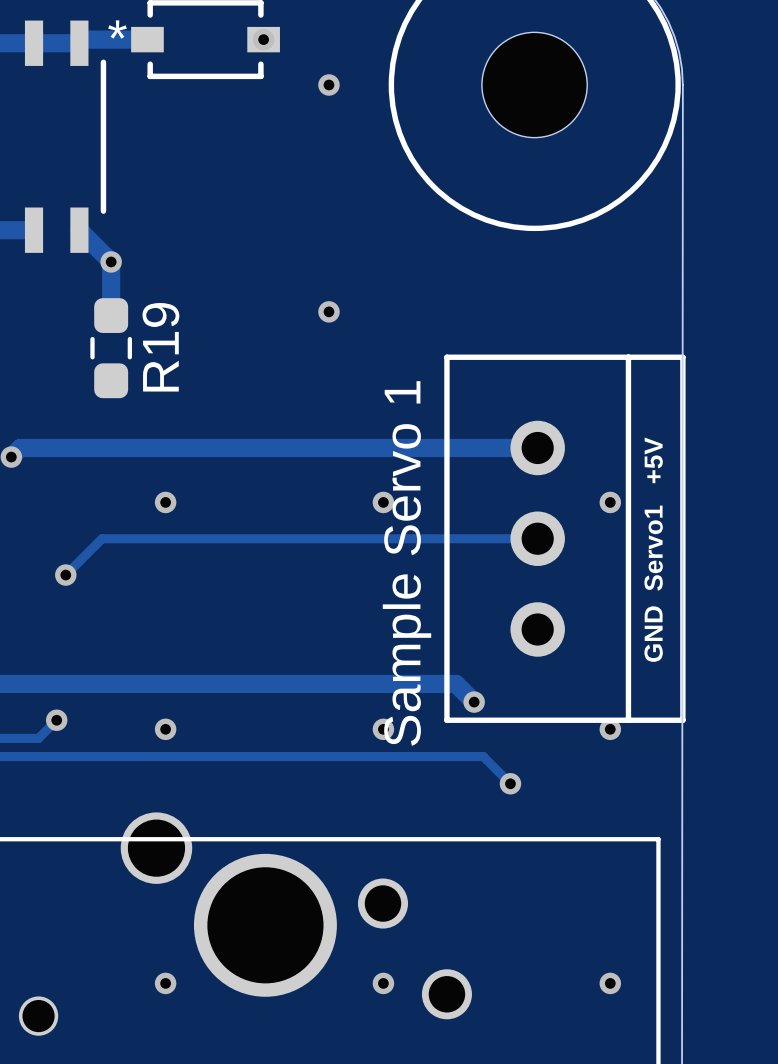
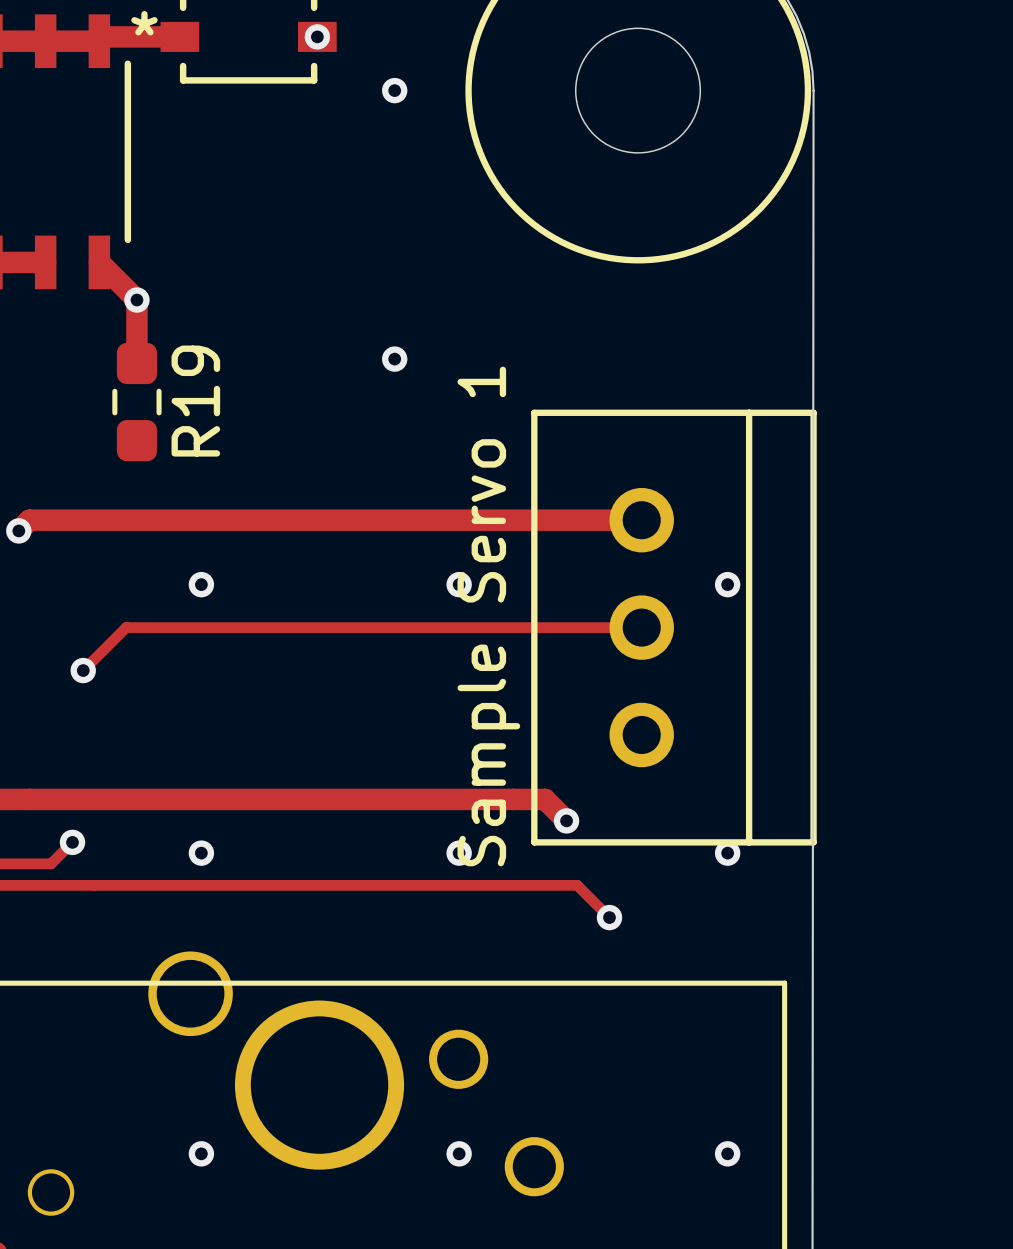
text: +5V (653, 460) -> none
text: Servo1 (653, 548) -> none
text: GND (653, 634) -> none

